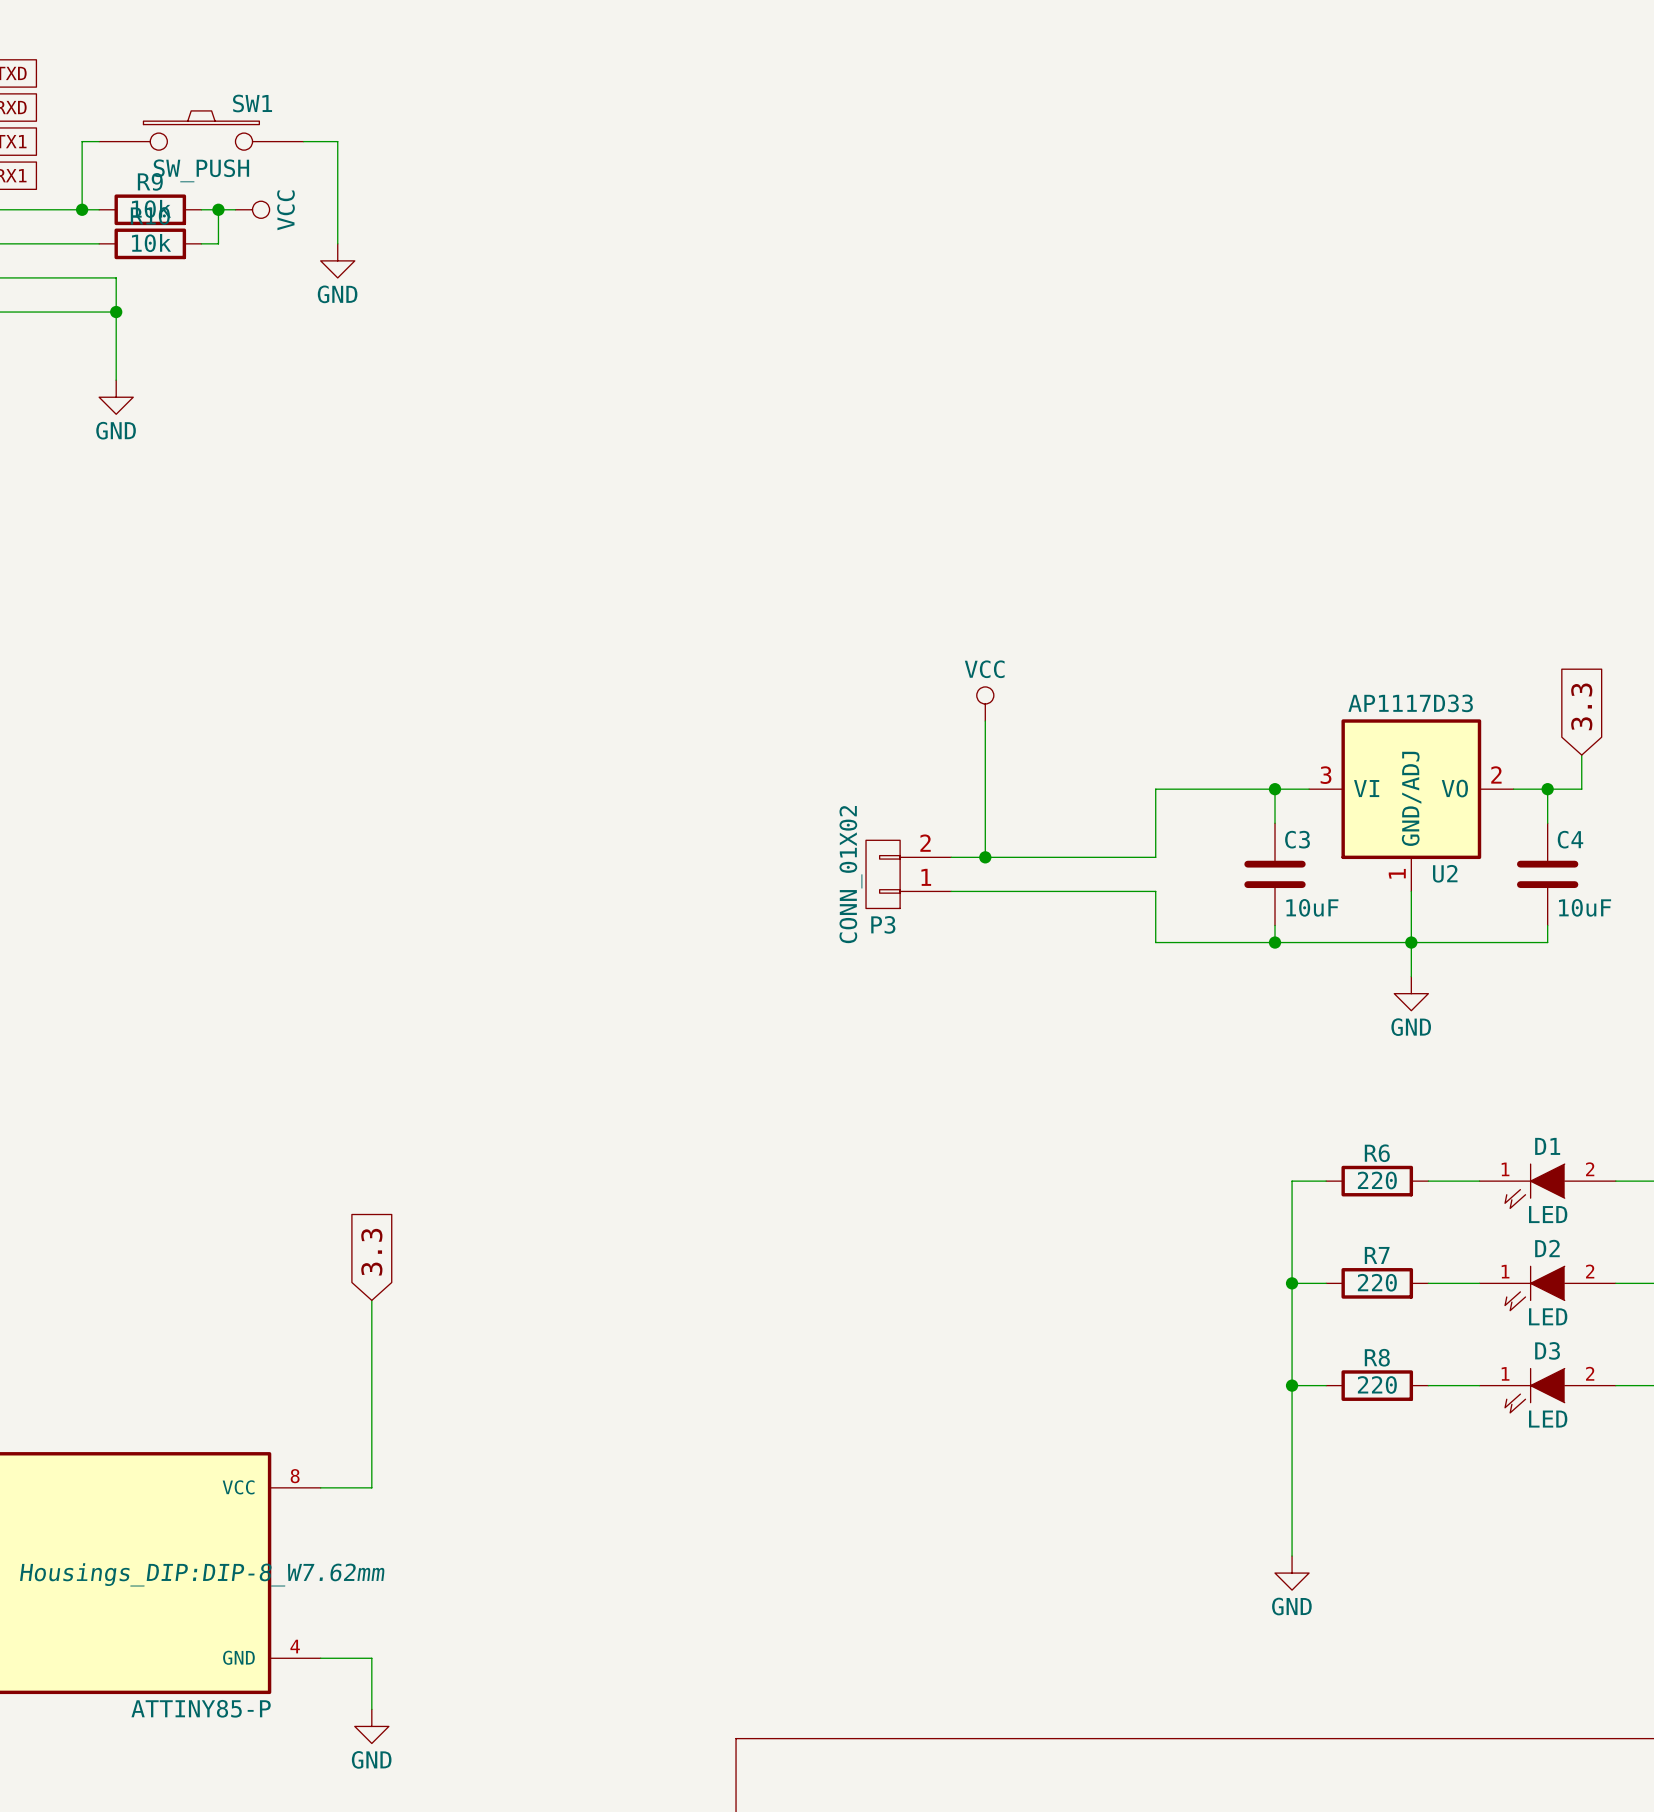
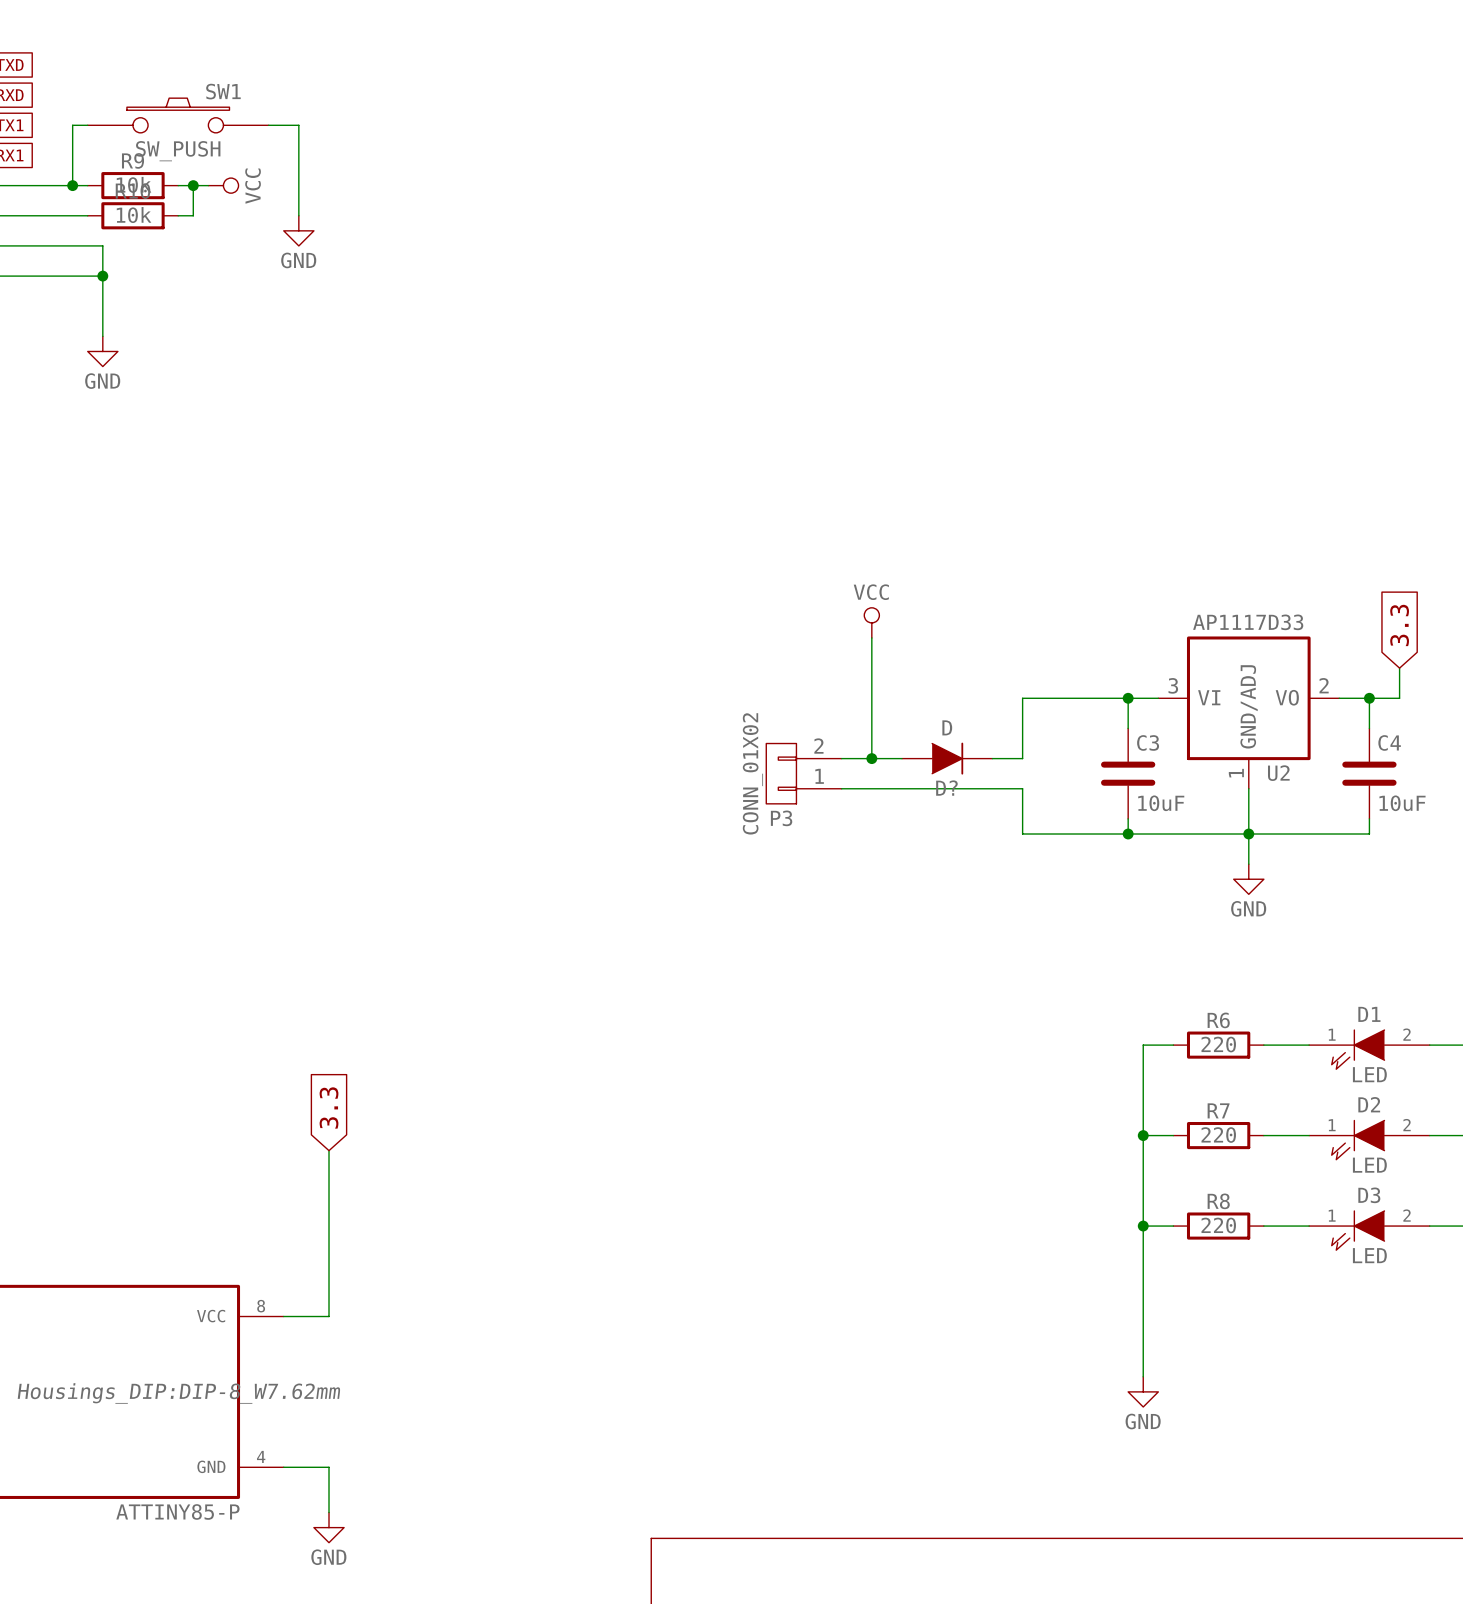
D?: none -> D (947, 758)

